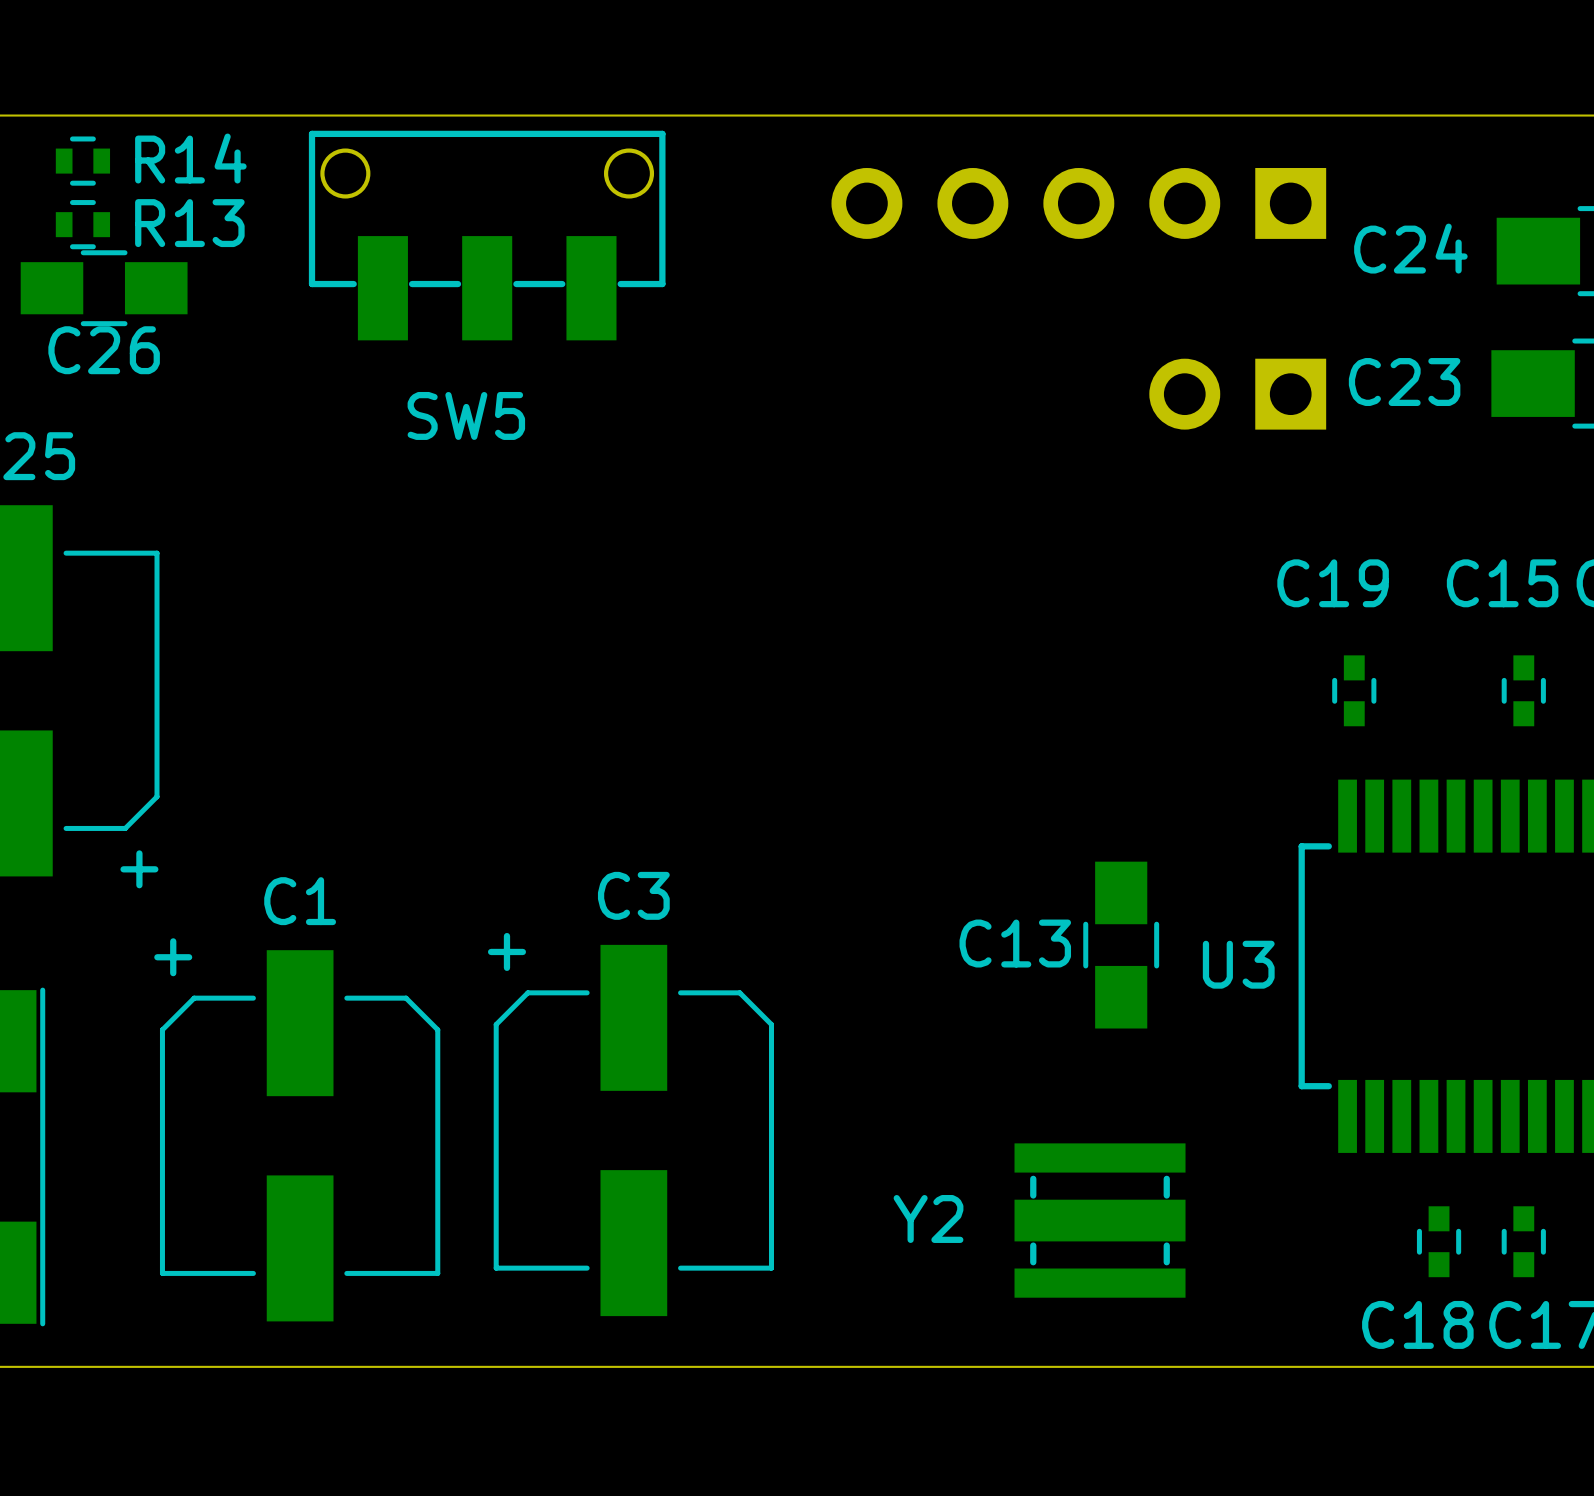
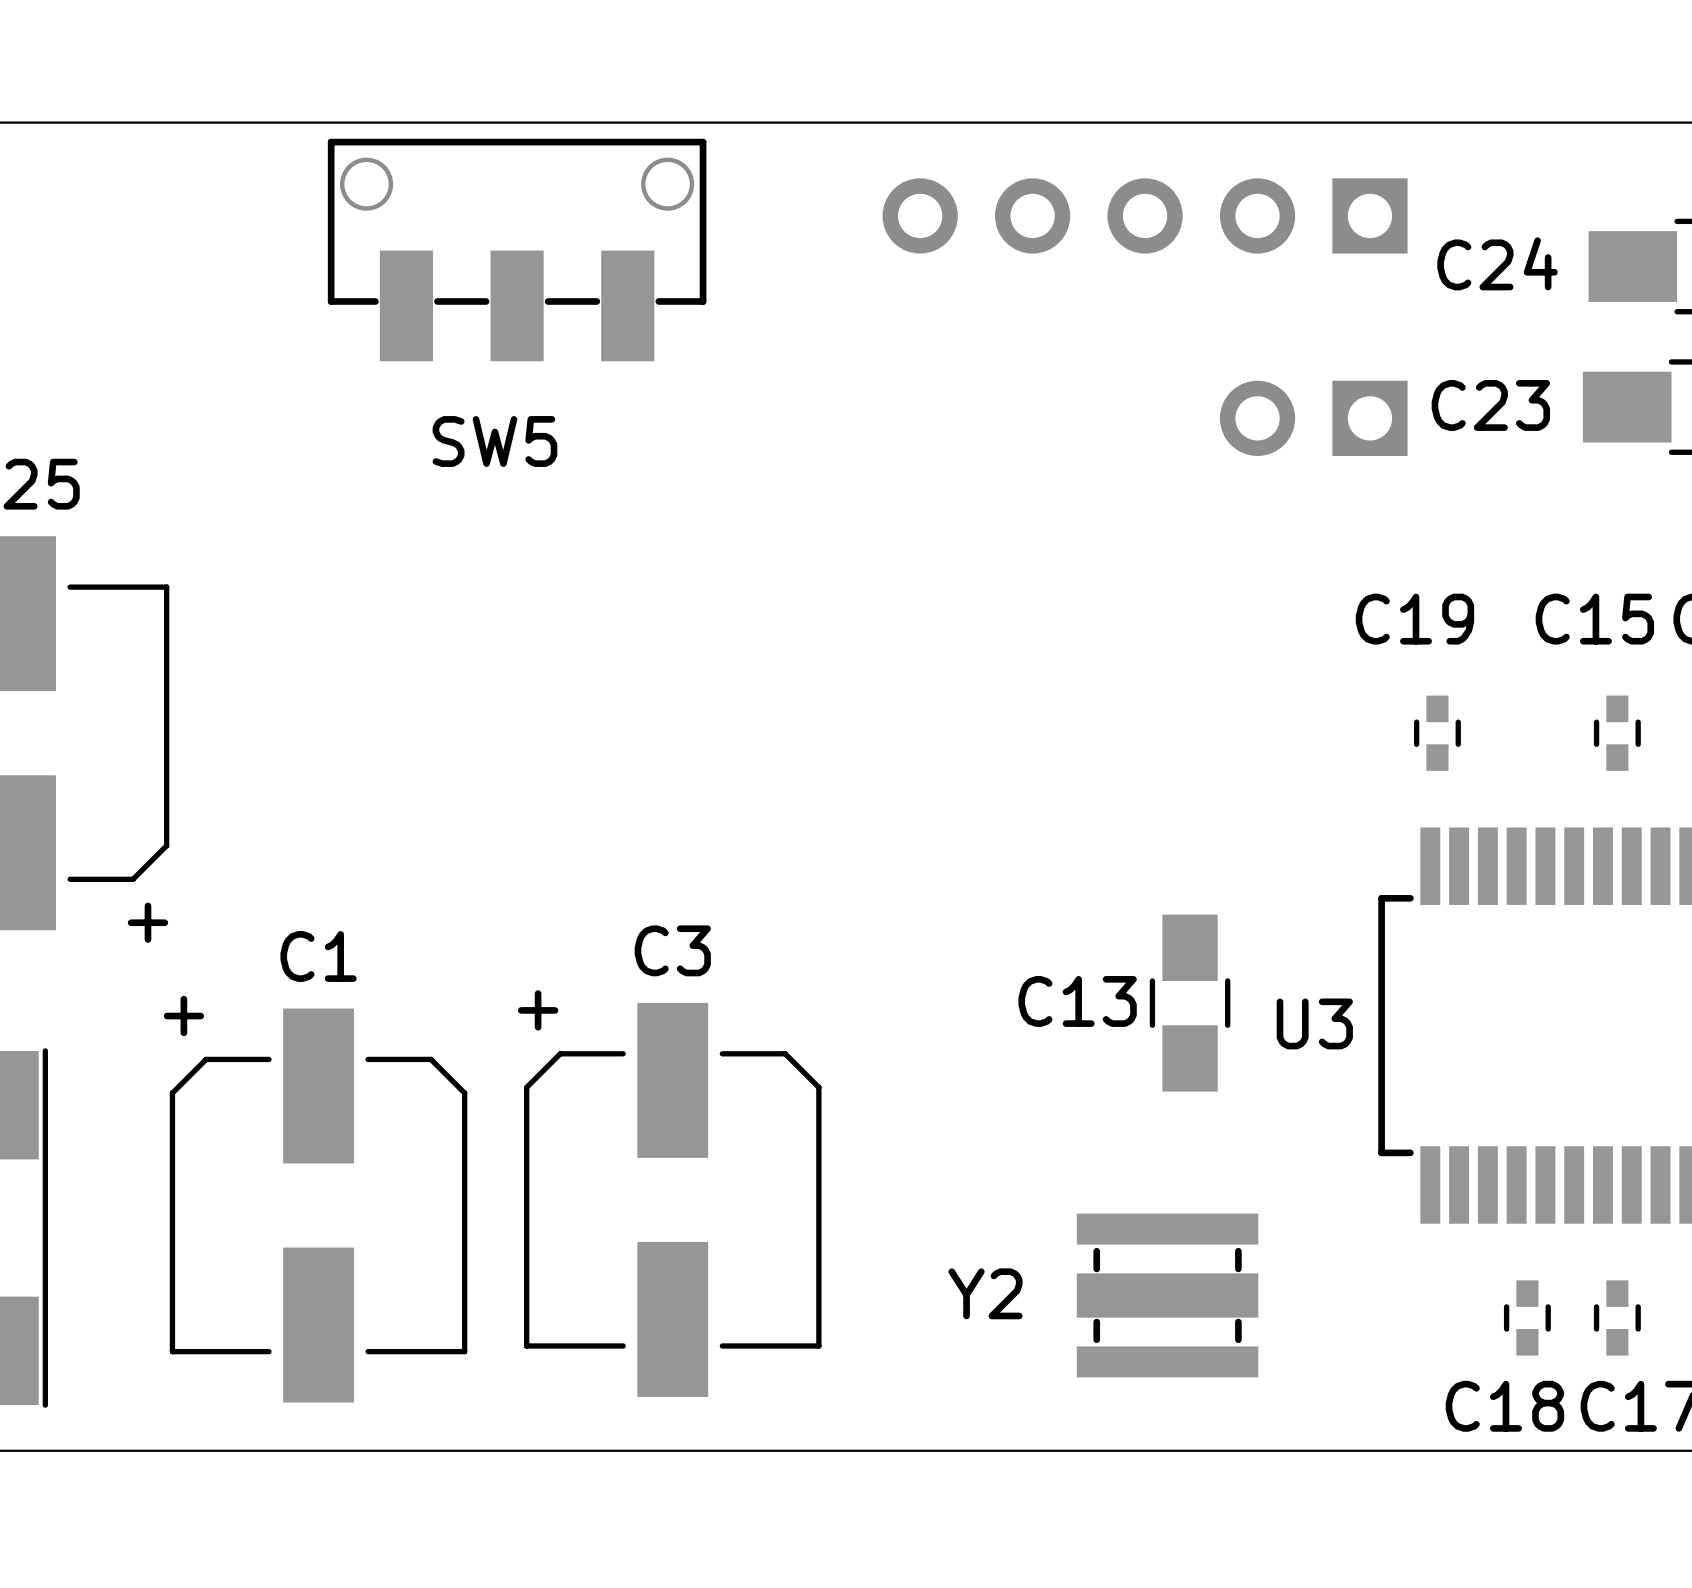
R14: (82, 161) -> none
R13: (82, 224) -> none
C26: (104, 288) -> none

